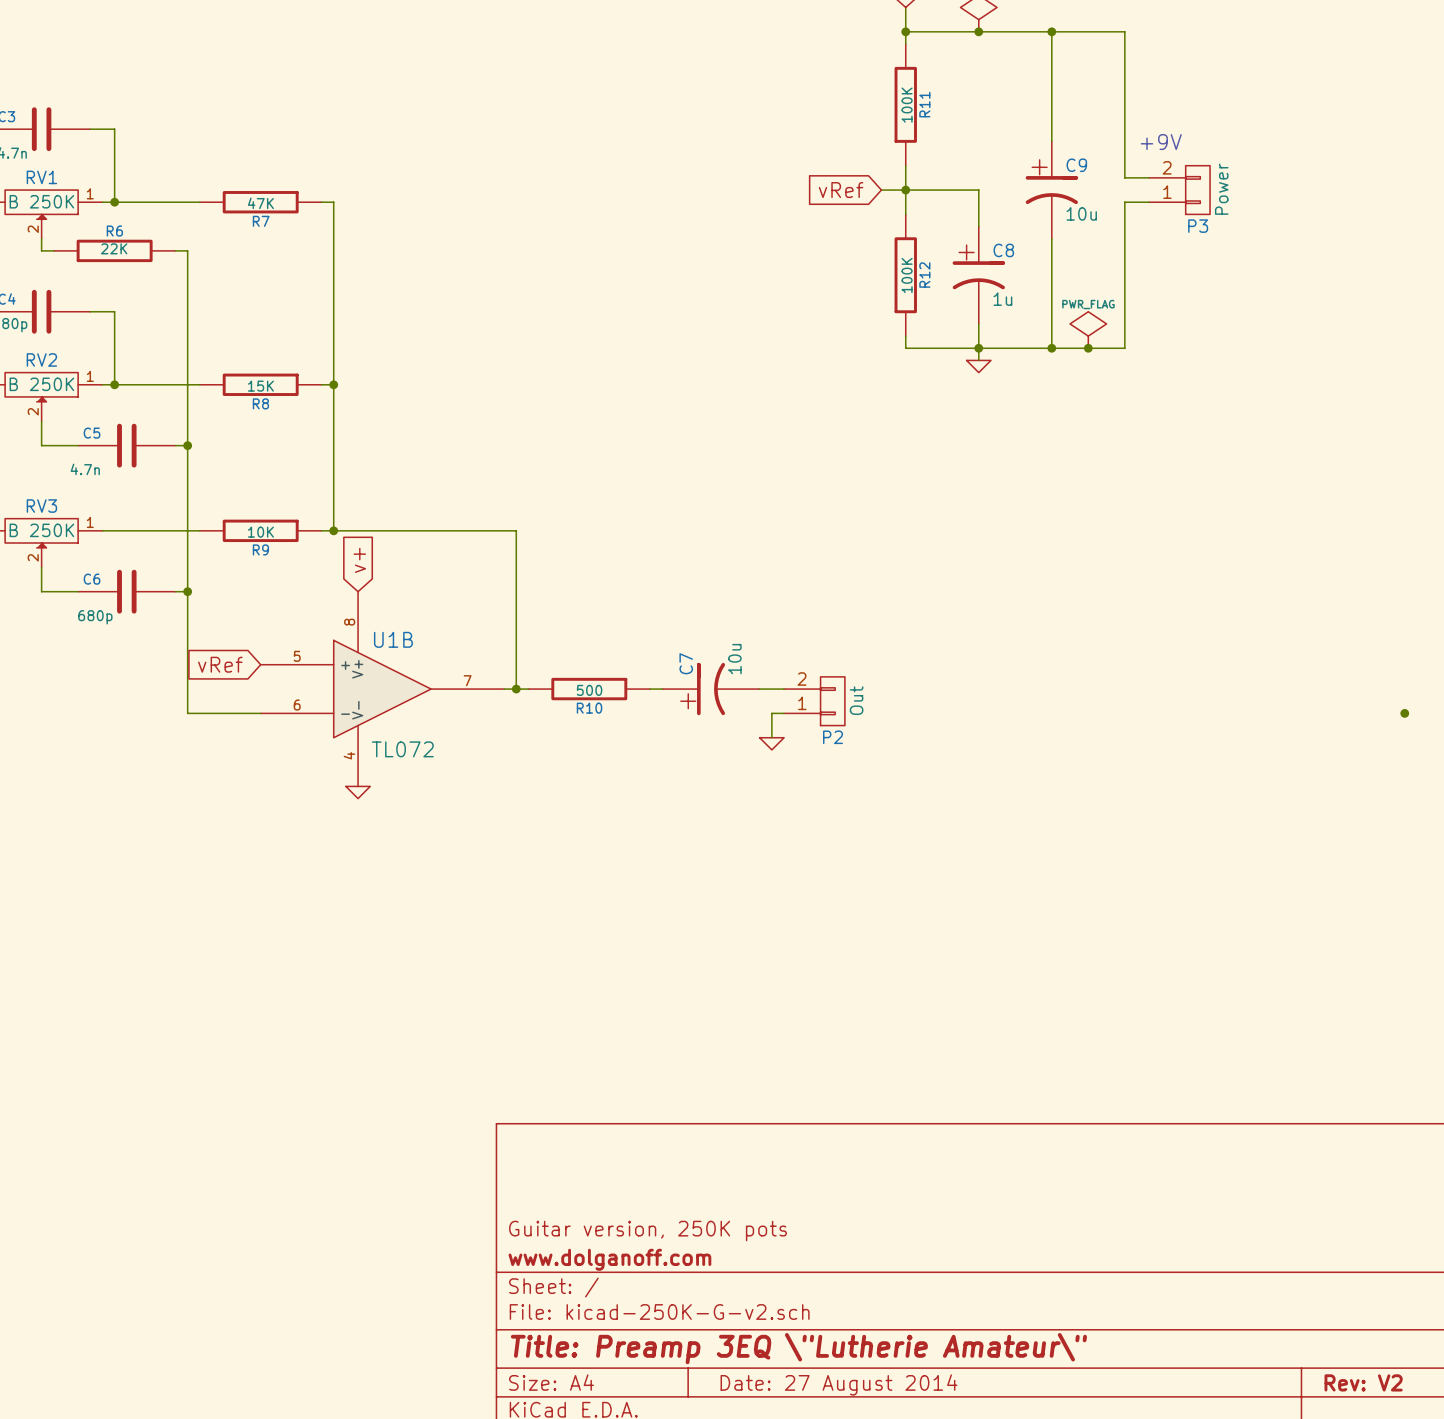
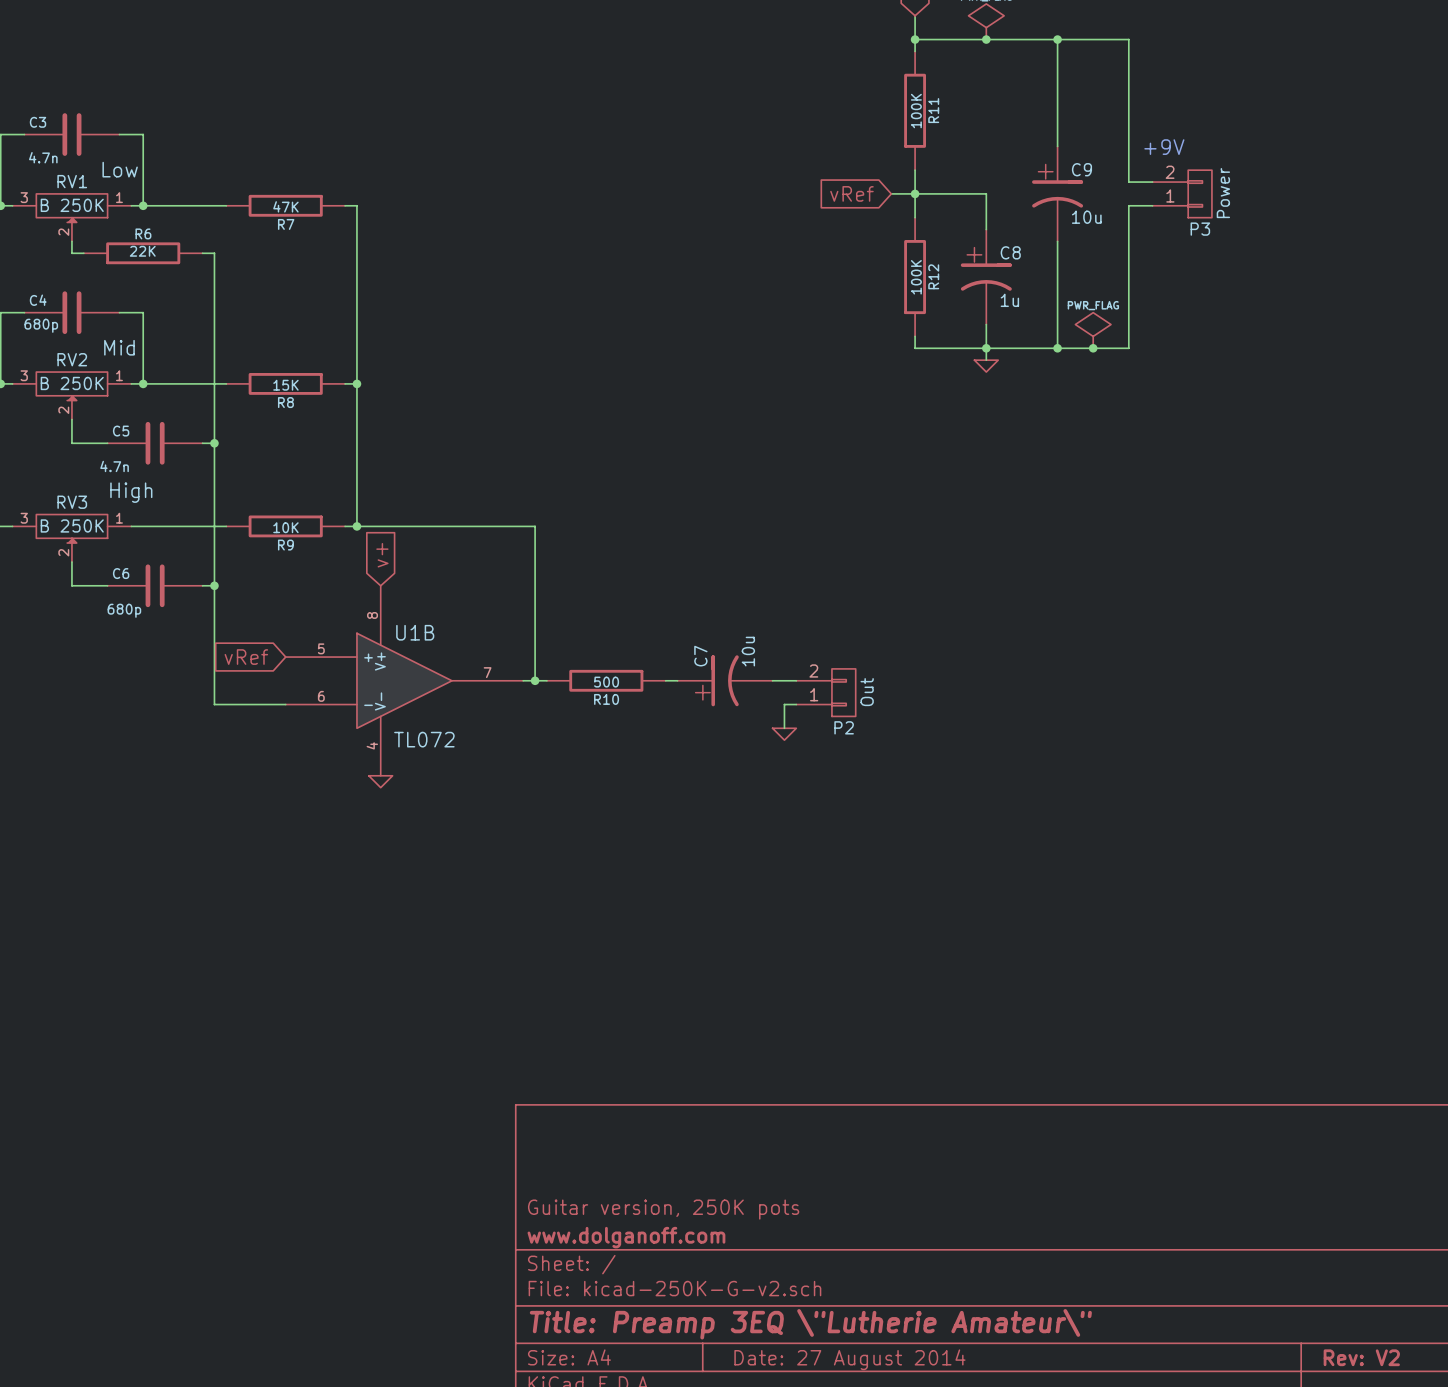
RV1 text: none -> Low (120, 169)
RV2 text: none -> Mid (119, 347)
RV3 text: none -> High (131, 492)
junction: (1404, 713) -> none

